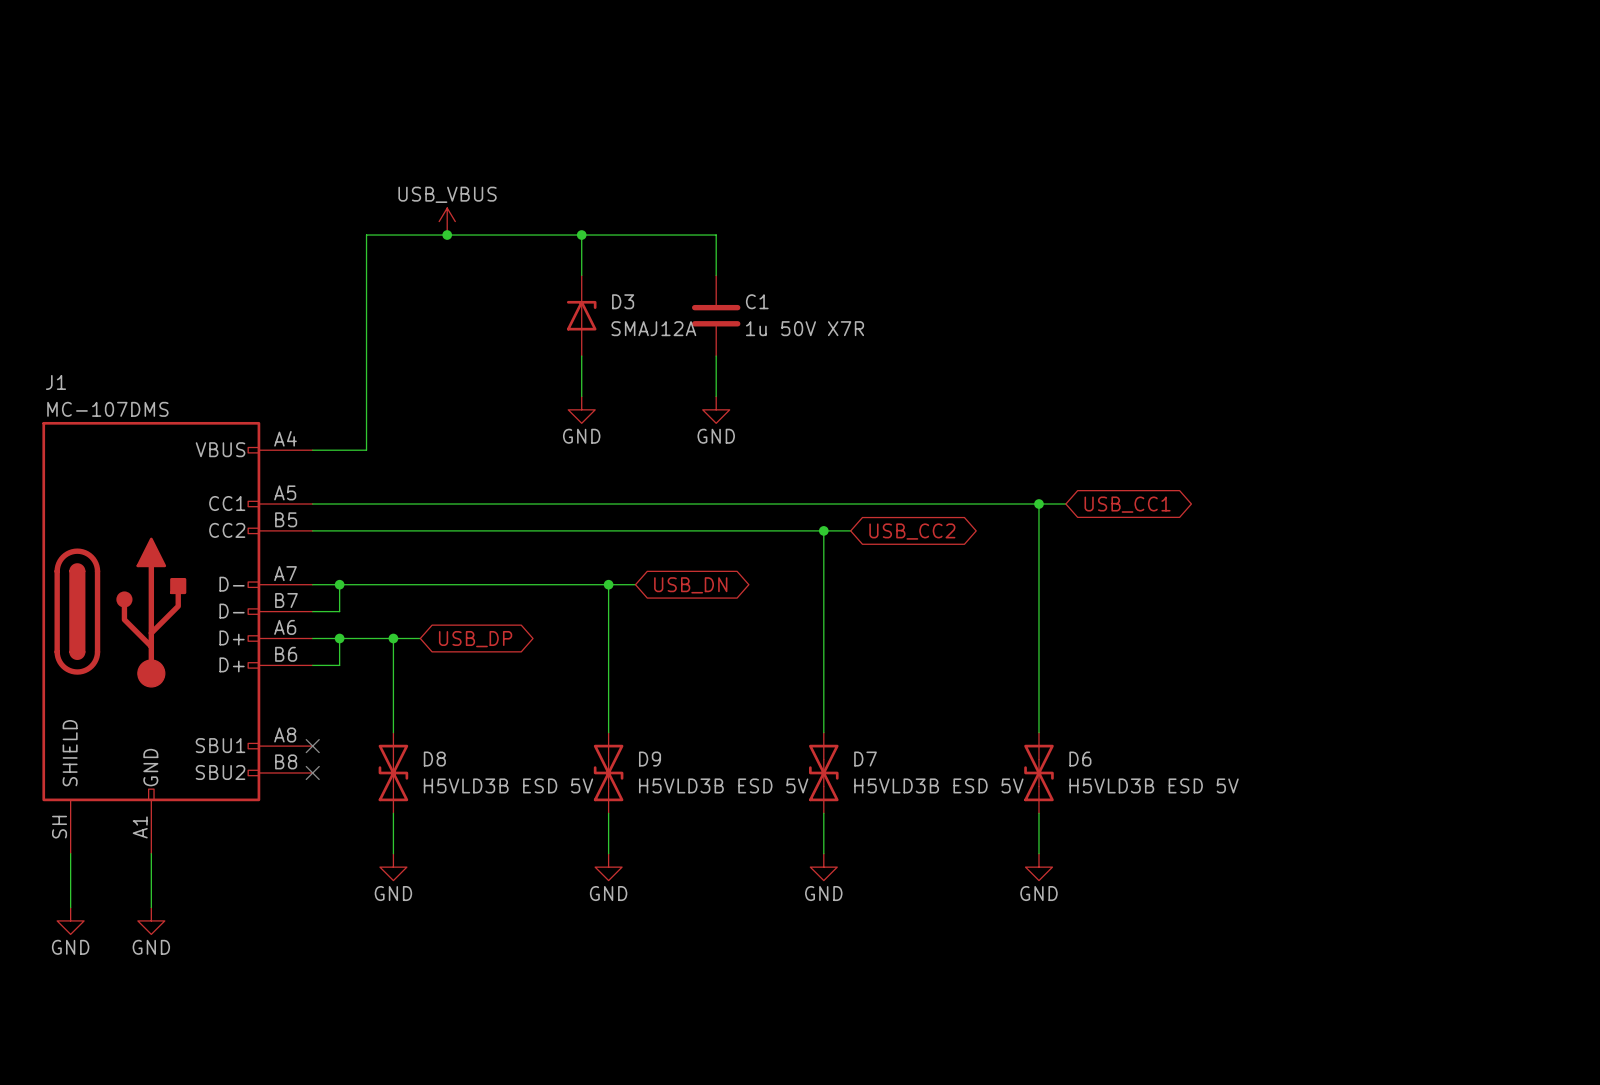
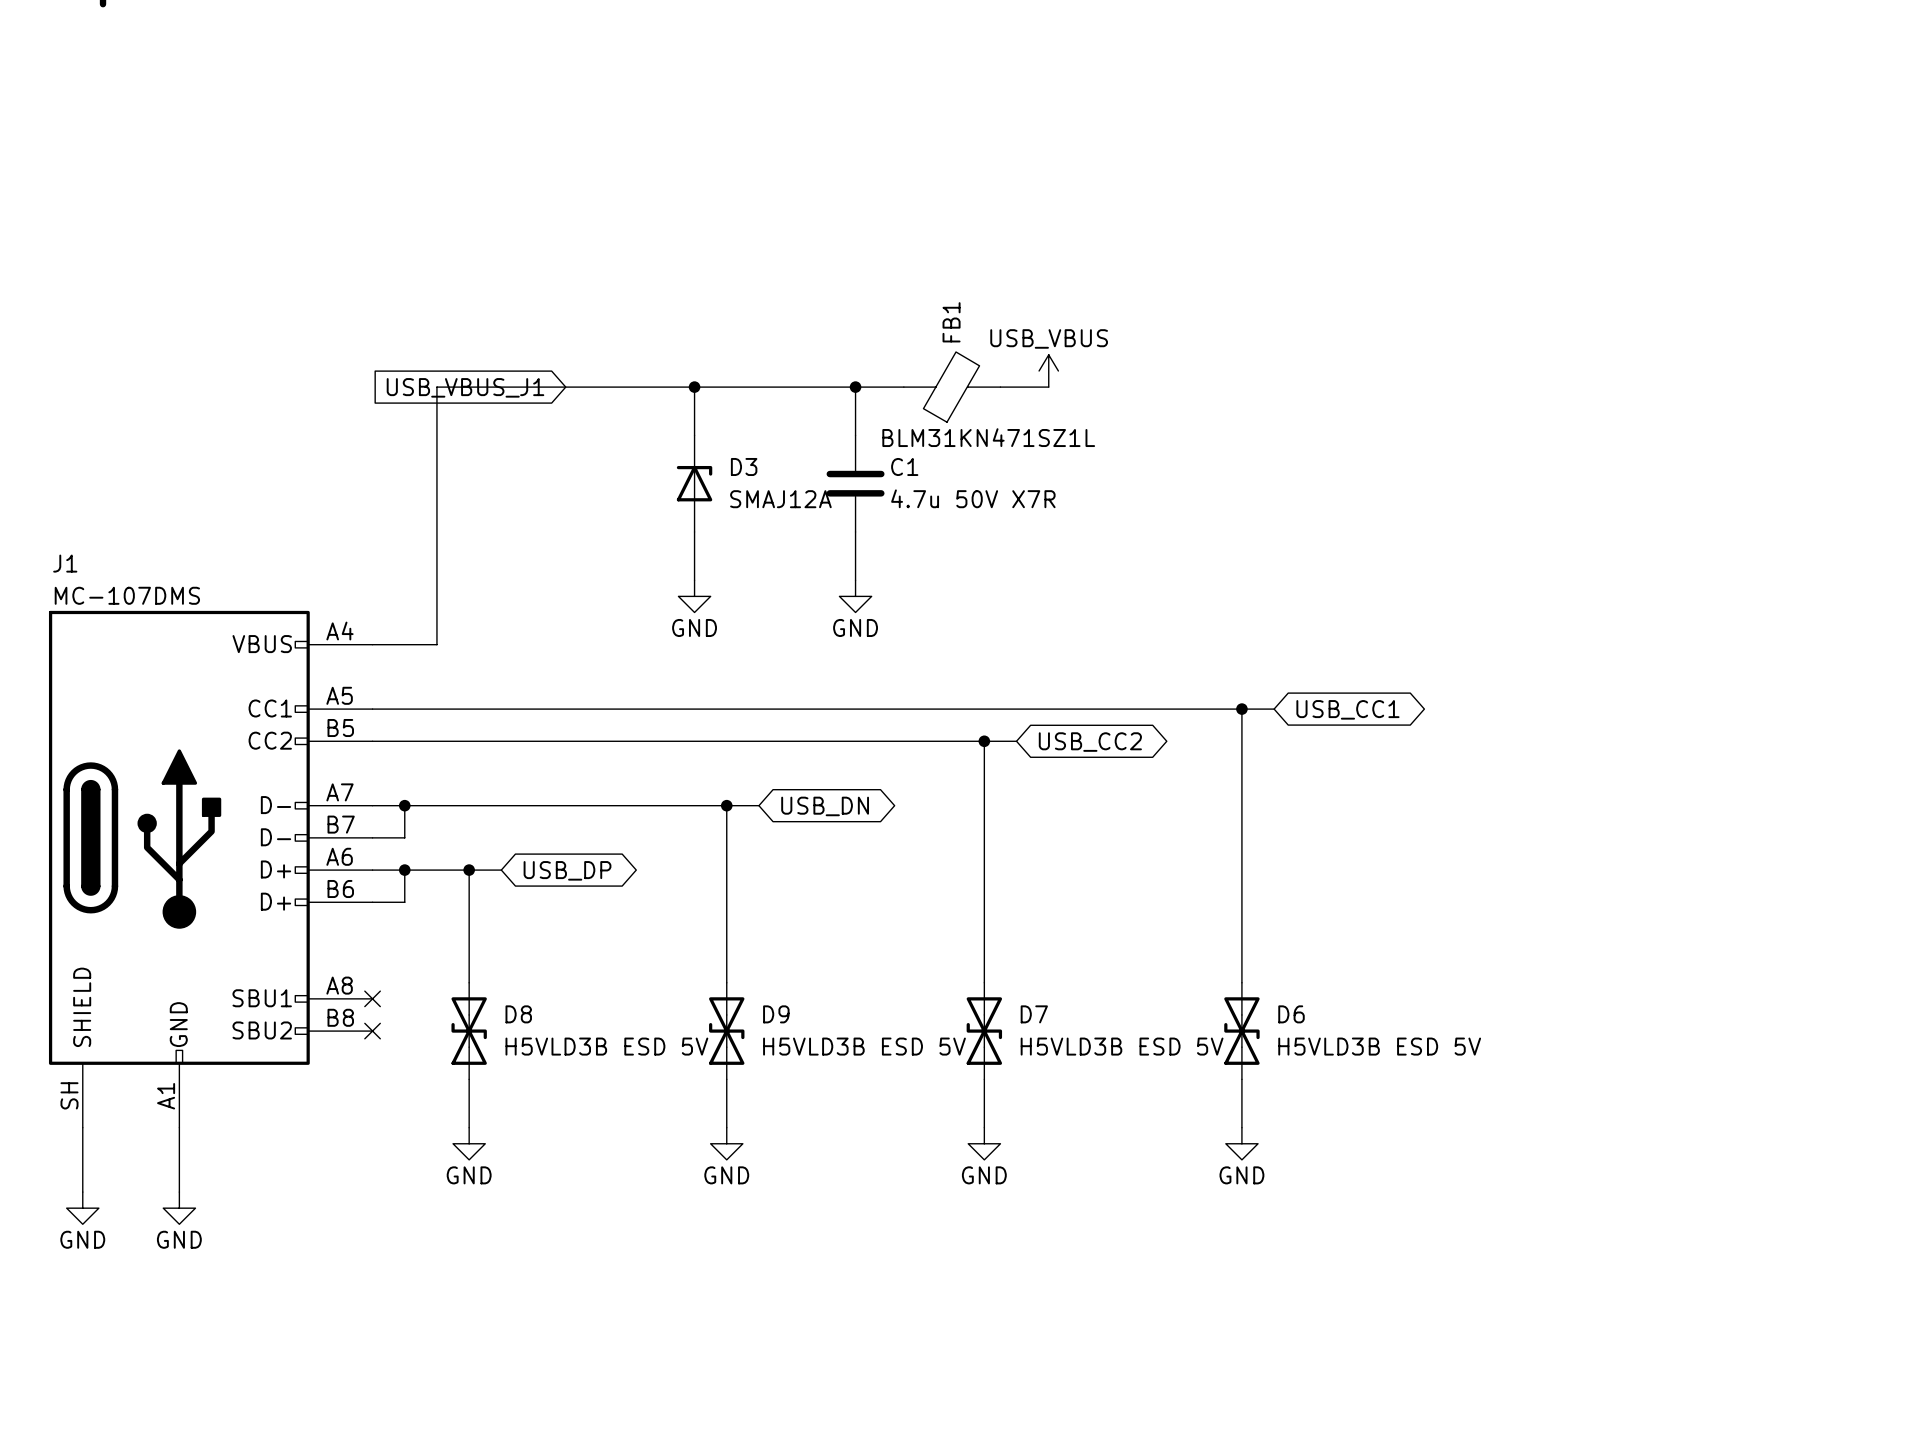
power symbol: USB_VBUS (447, 221) -> none
power symbol: none -> USB_VBUS (1048, 370)
global label: none -> USB_VBUS_J1 (465, 387)
junction: (447, 235) -> none
wire: none -> (855, 387) (903, 387)
junction: none -> (855, 387)
FB1: none -> BLM31KN471SZ1L (952, 387)
wire: none -> (1000, 387) (1048, 387)
C1 value: 1u 50V X7R (805, 328) -> 4.7u 50V X7R (973, 498)

